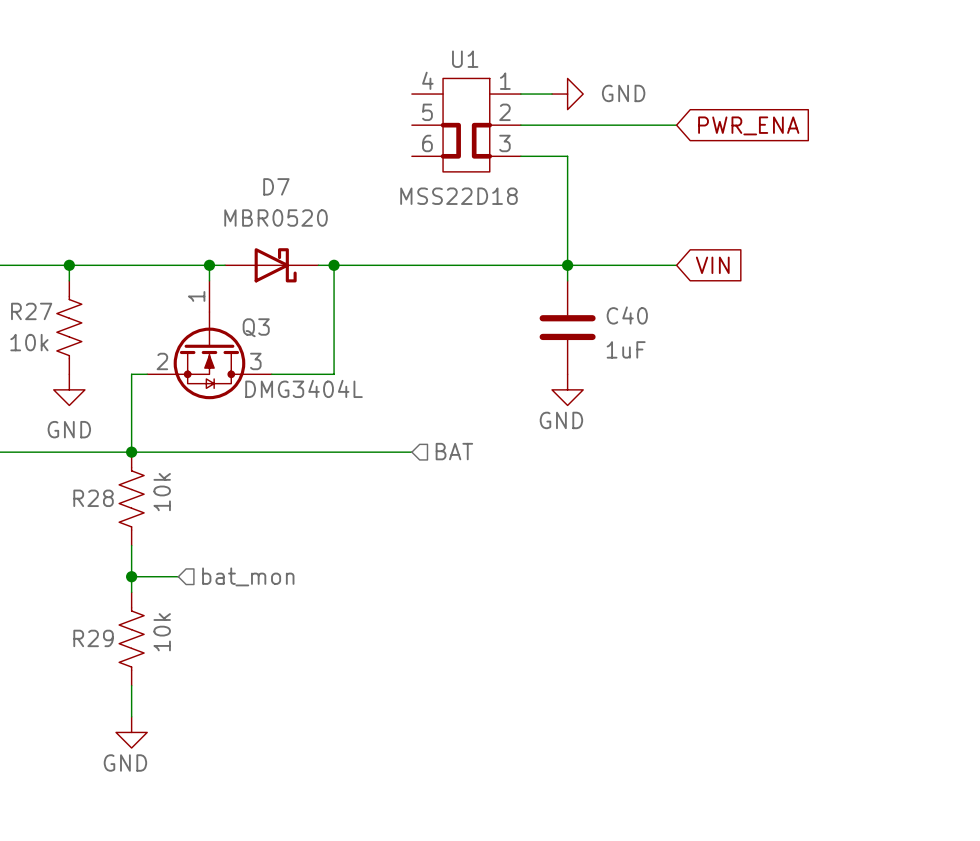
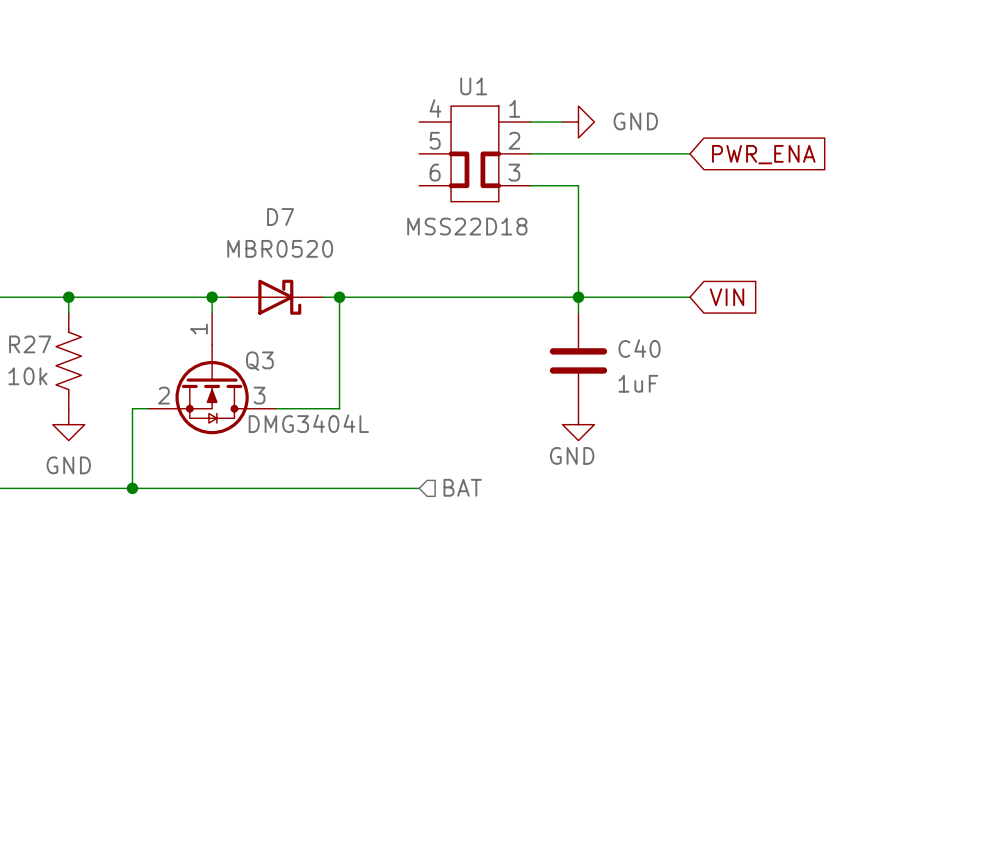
R28: 10k (131, 498) -> none
wire: (131, 545) (131, 592) -> none
wire: (131, 576) (178, 576) -> none
junction: (131, 576) -> none
hierarchical label: bat_mon (248, 576) -> none
R29: 10k (131, 639) -> none
wire: (131, 685) (131, 716) -> none
power symbol: GND (131, 732) -> none

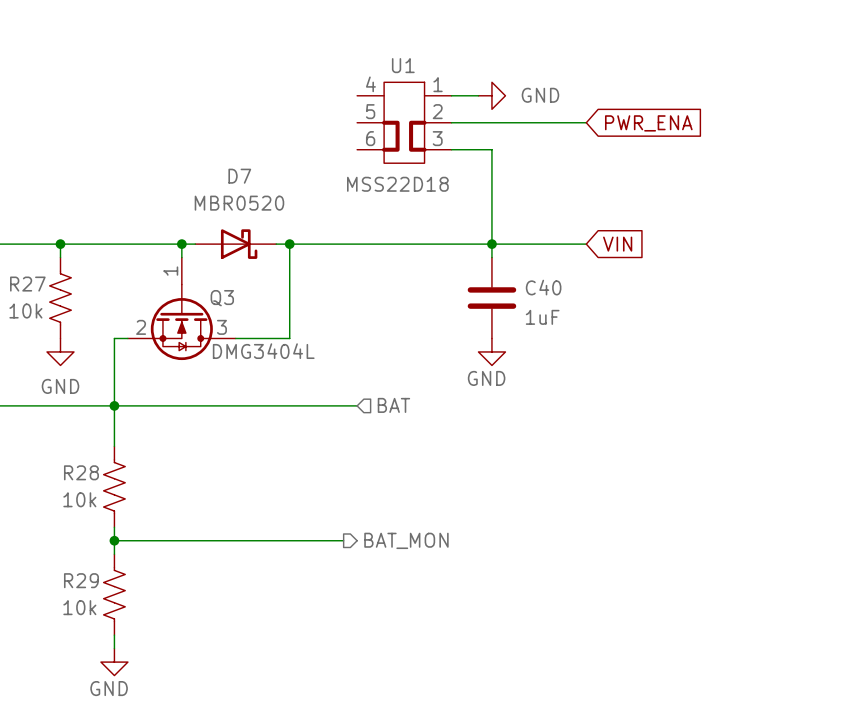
wire: none -> (114, 405) (114, 446)
R28: none -> 10k (114, 486)
wire: none -> (114, 527) (114, 554)
wire: none -> (114, 540) (343, 540)
junction: none -> (114, 540)
hierarchical label: none -> BAT_MON (406, 540)
R29: none -> 10k (114, 594)
wire: none -> (114, 635) (114, 648)
power symbol: none -> GND (114, 662)

